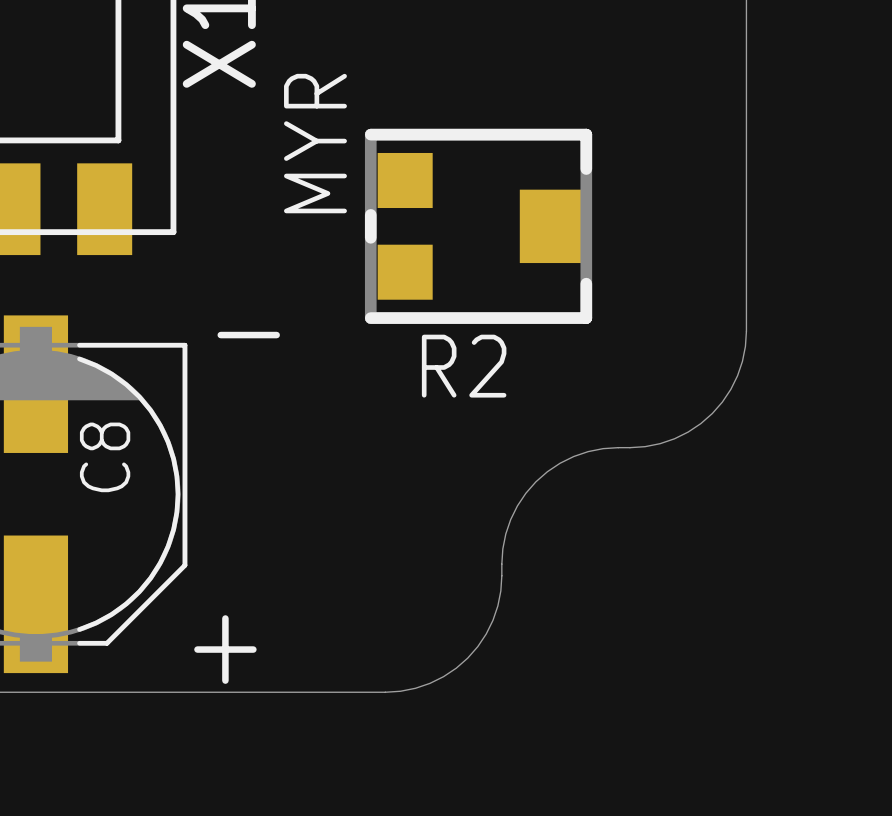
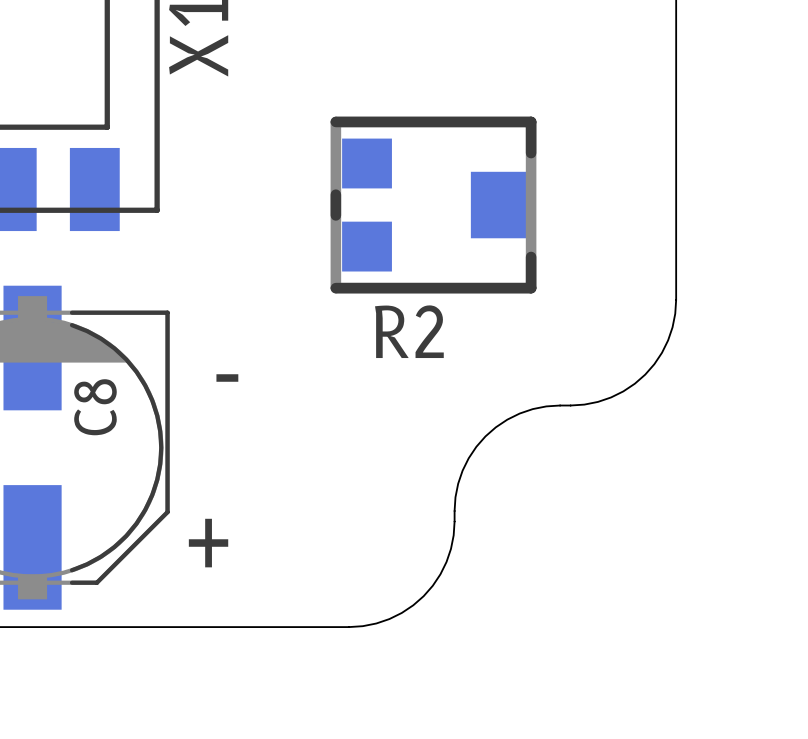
text: MYR (315, 143) -> none
text position: - (248, 335) -> - (227, 378)
text position: + (225, 649) -> + (208, 543)

